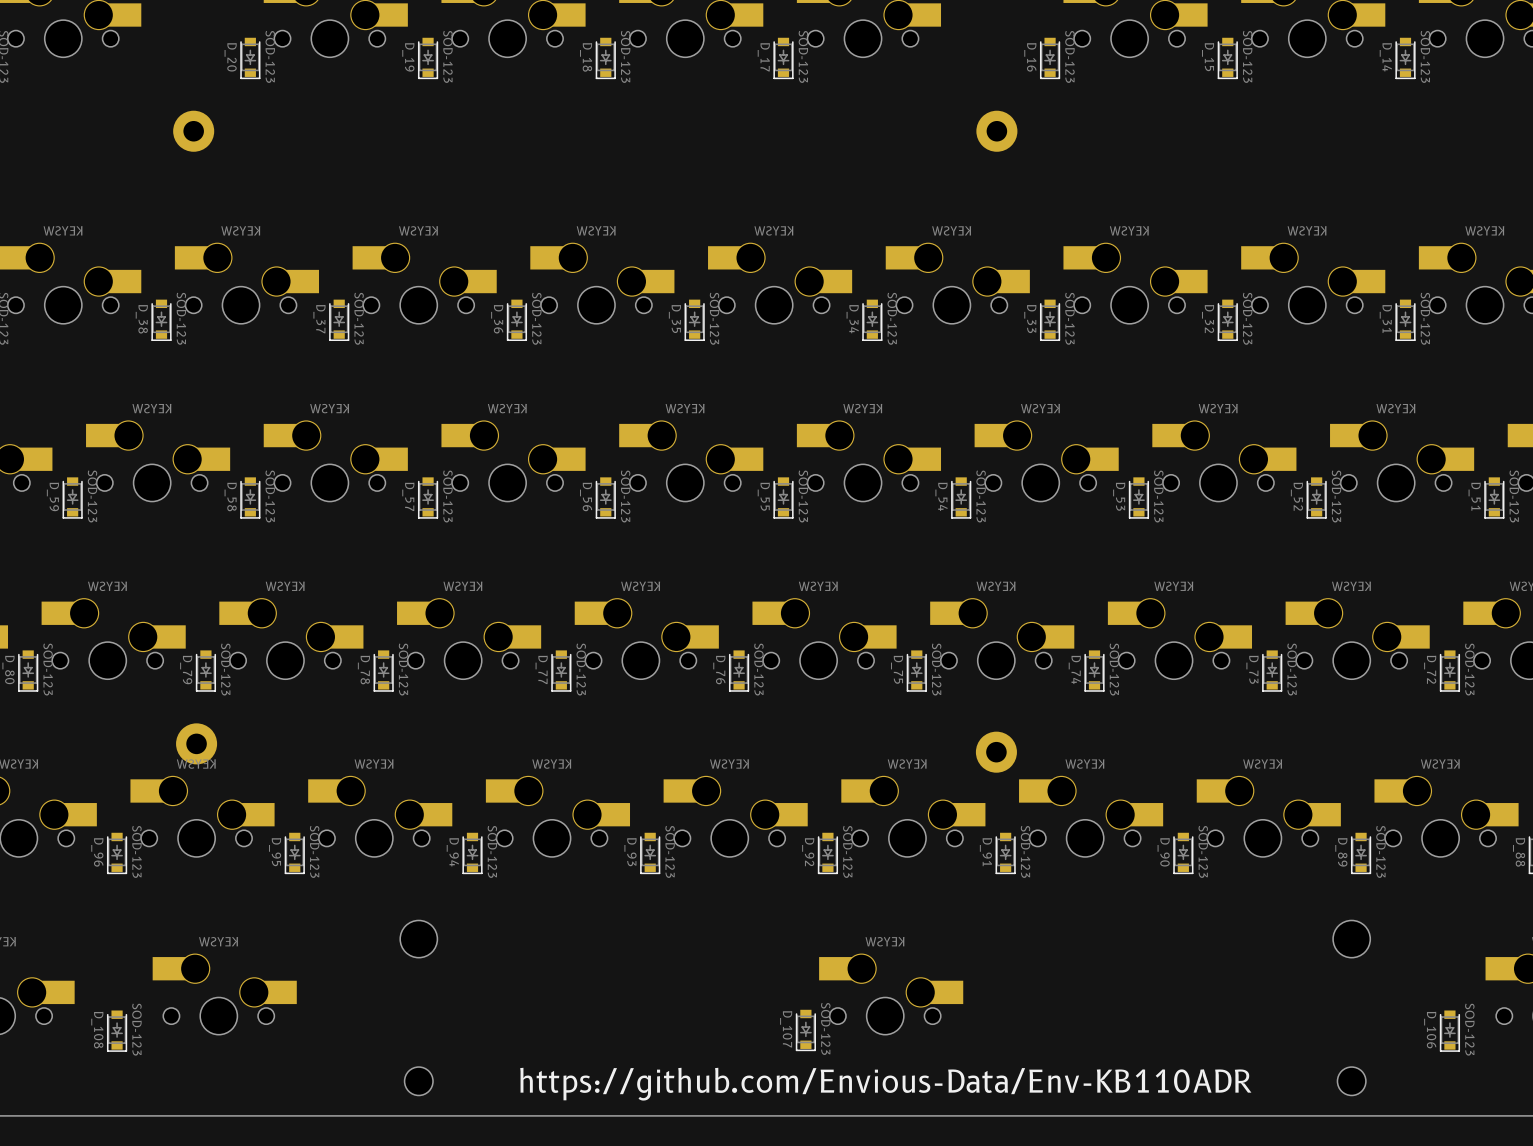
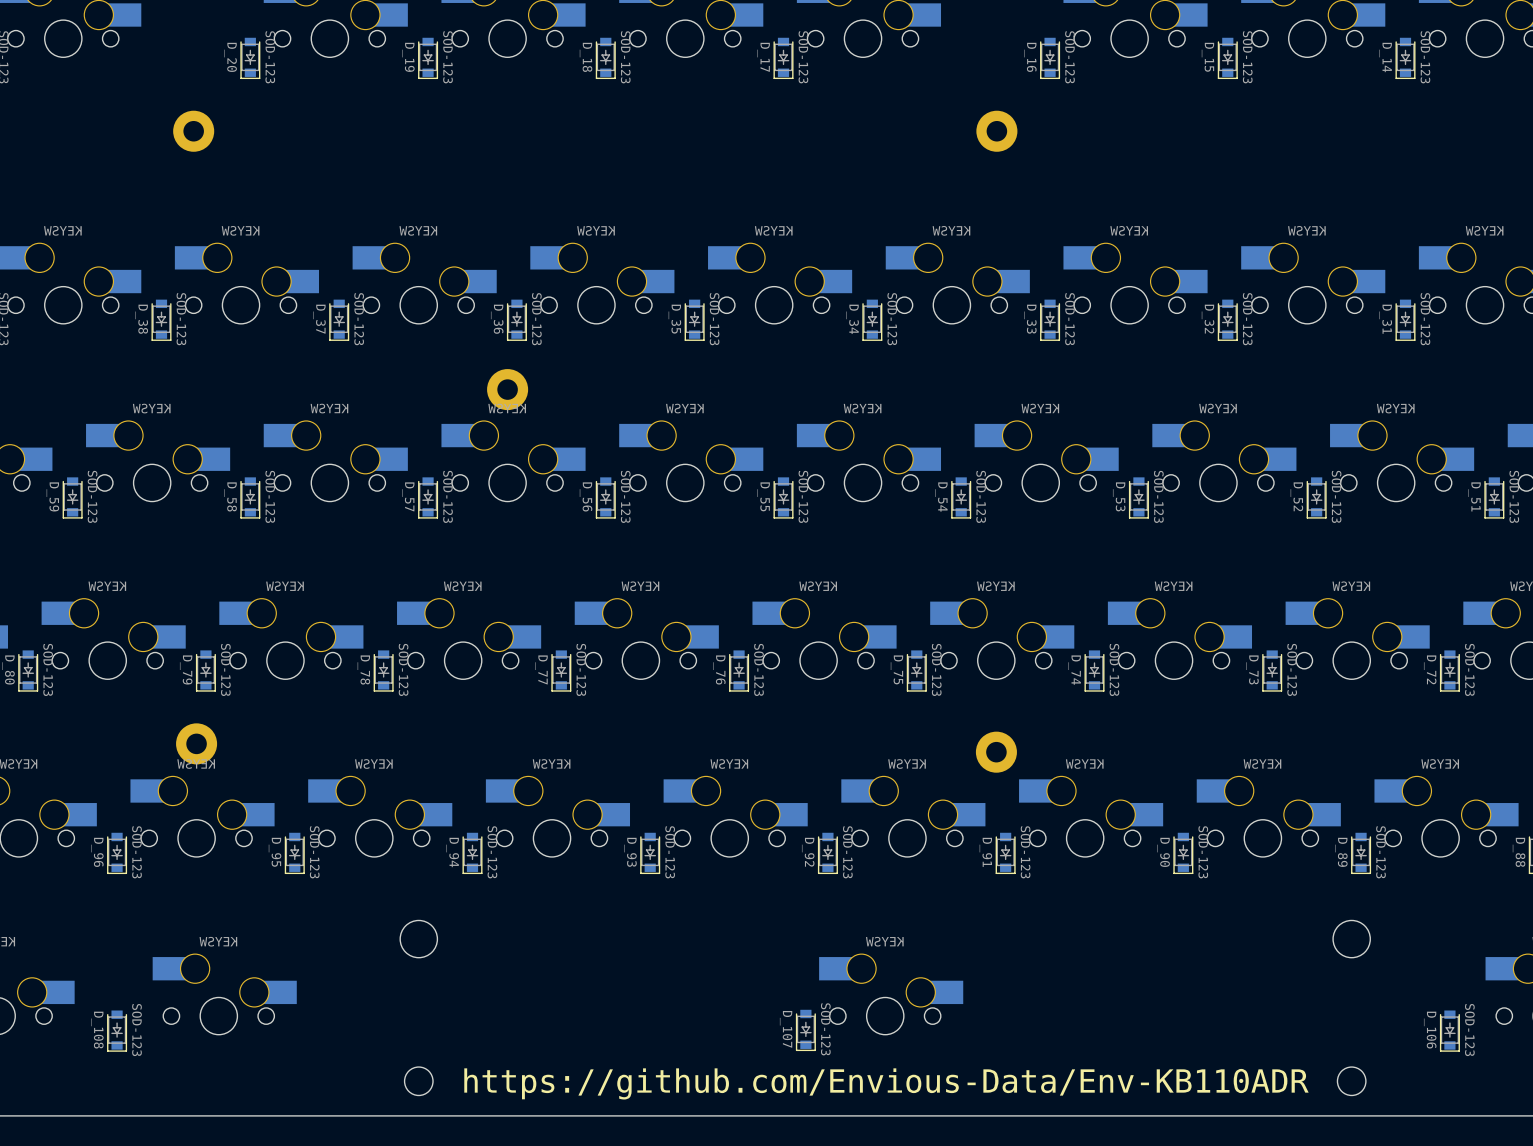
part: none -> (507, 389)

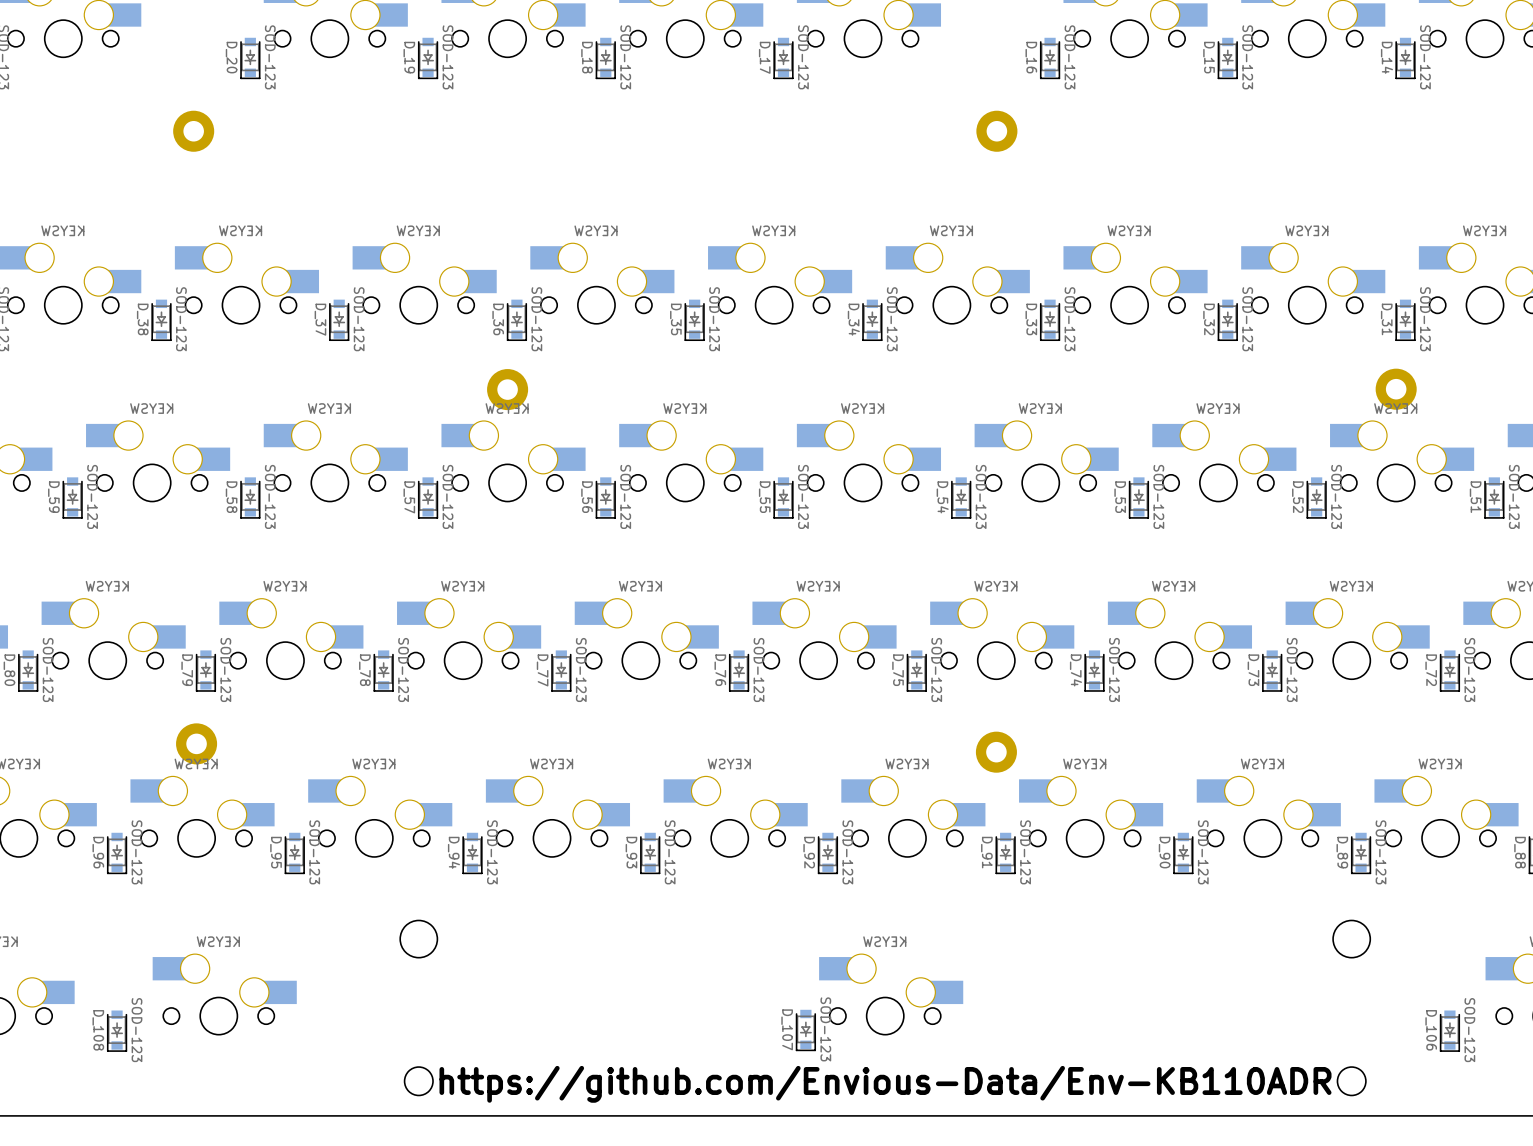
part: none -> (1396, 389)

